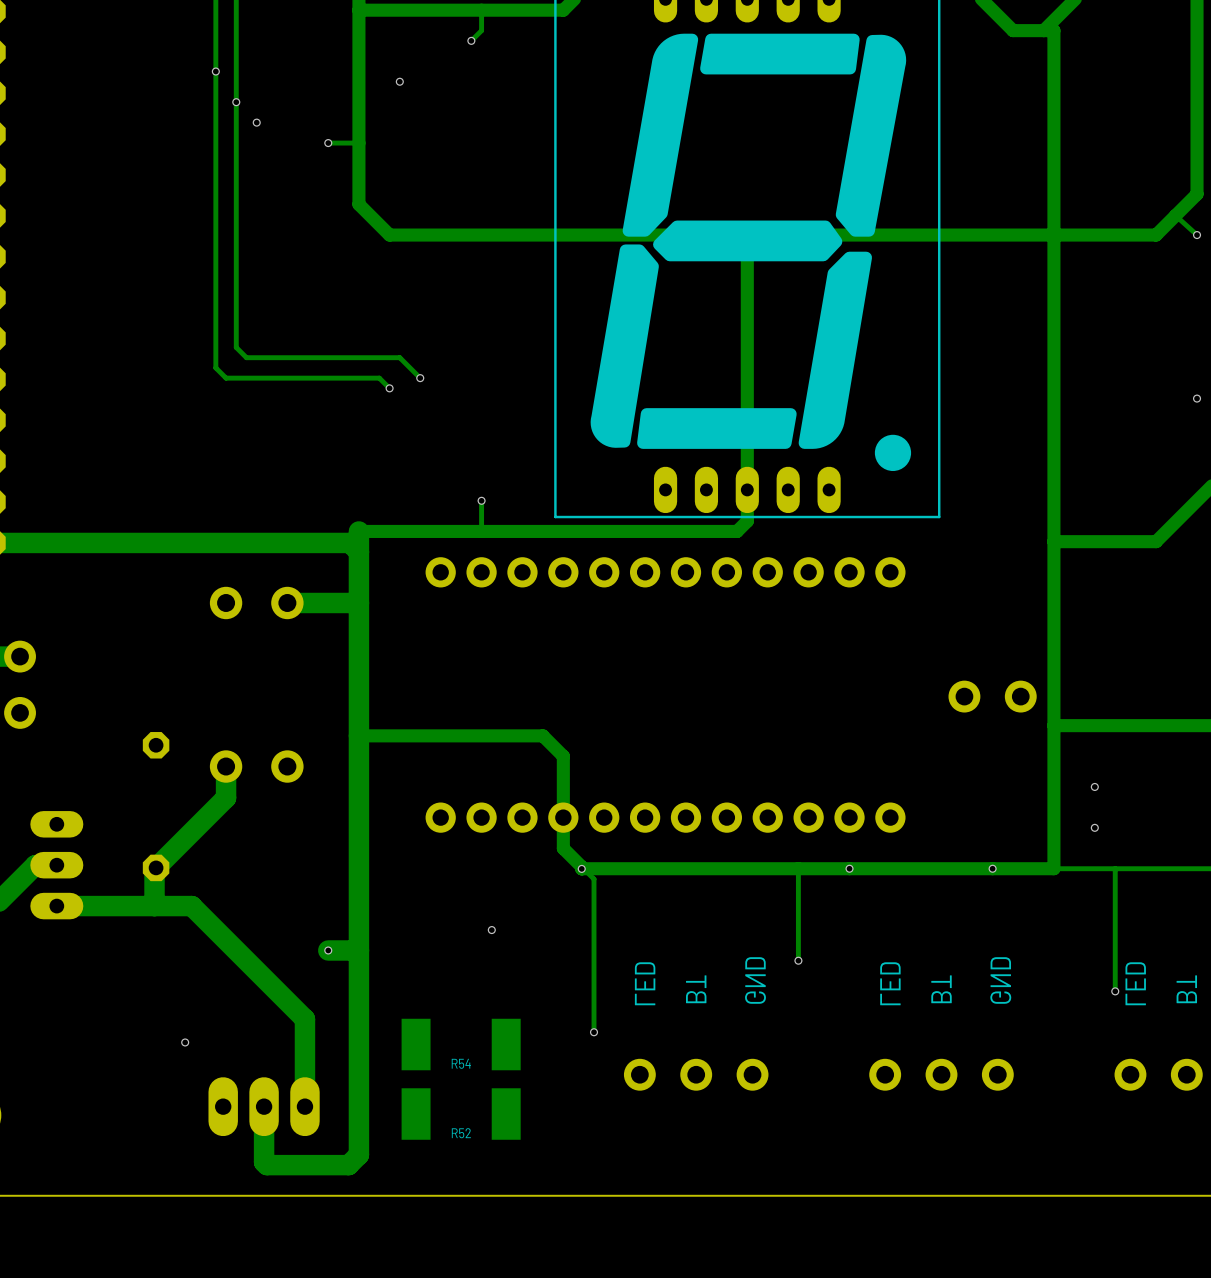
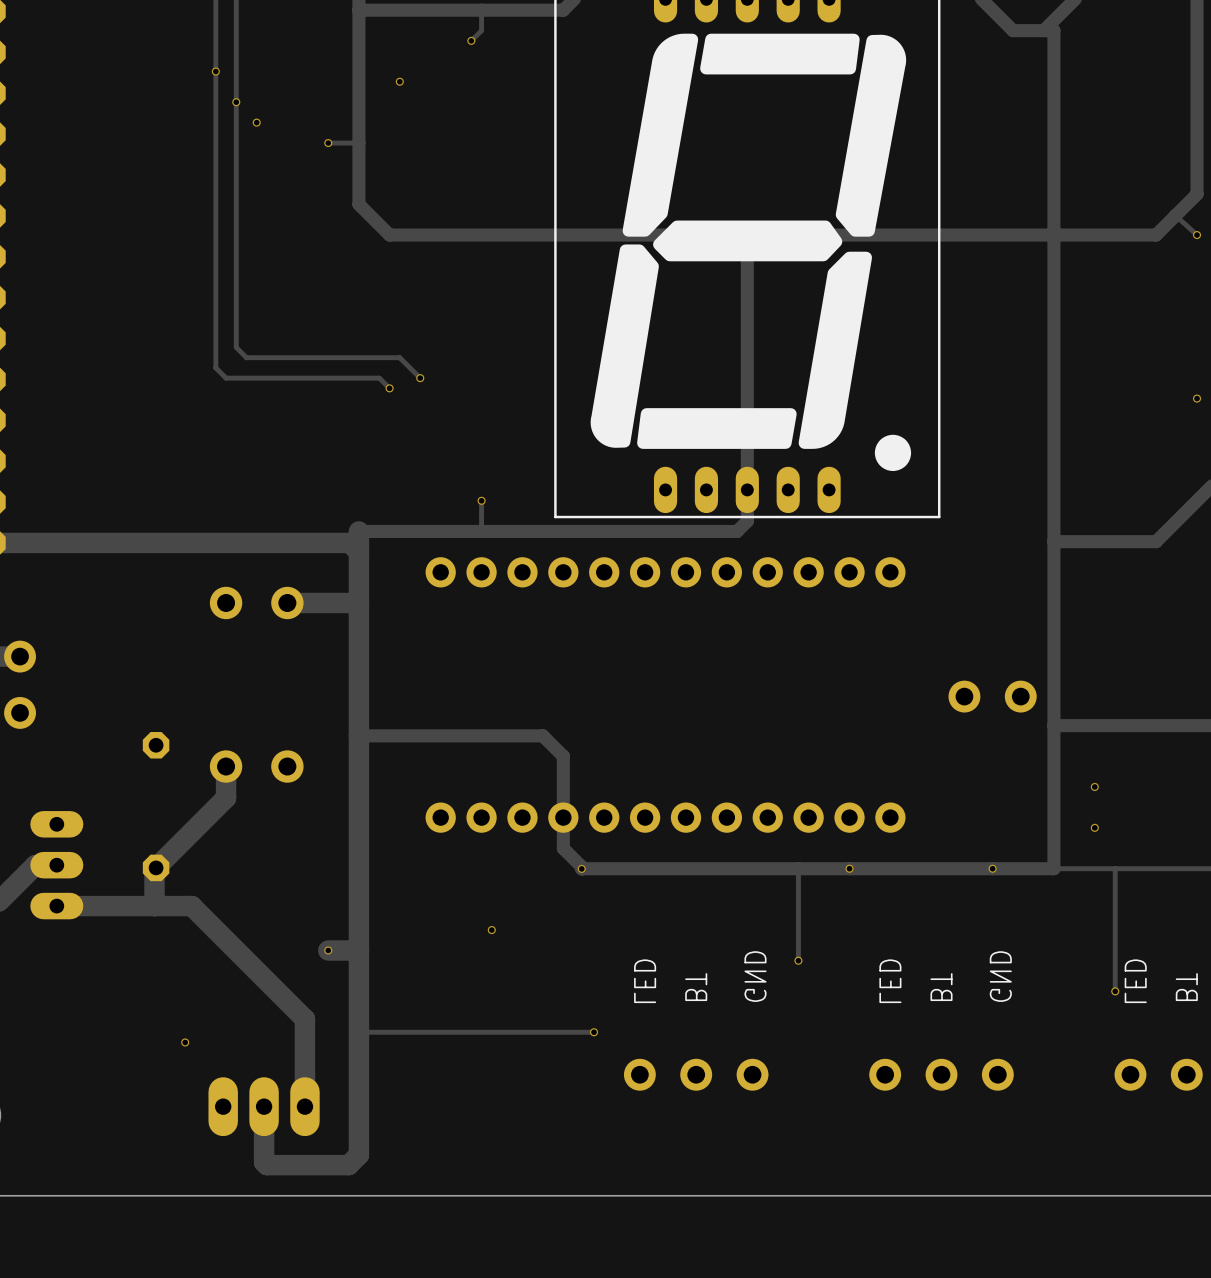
track: (581, 866) (594, 879) (594, 1032) -> (358, 1032) (594, 1032)
R54: (461, 1044) -> none
R52: (461, 1114) -> none

